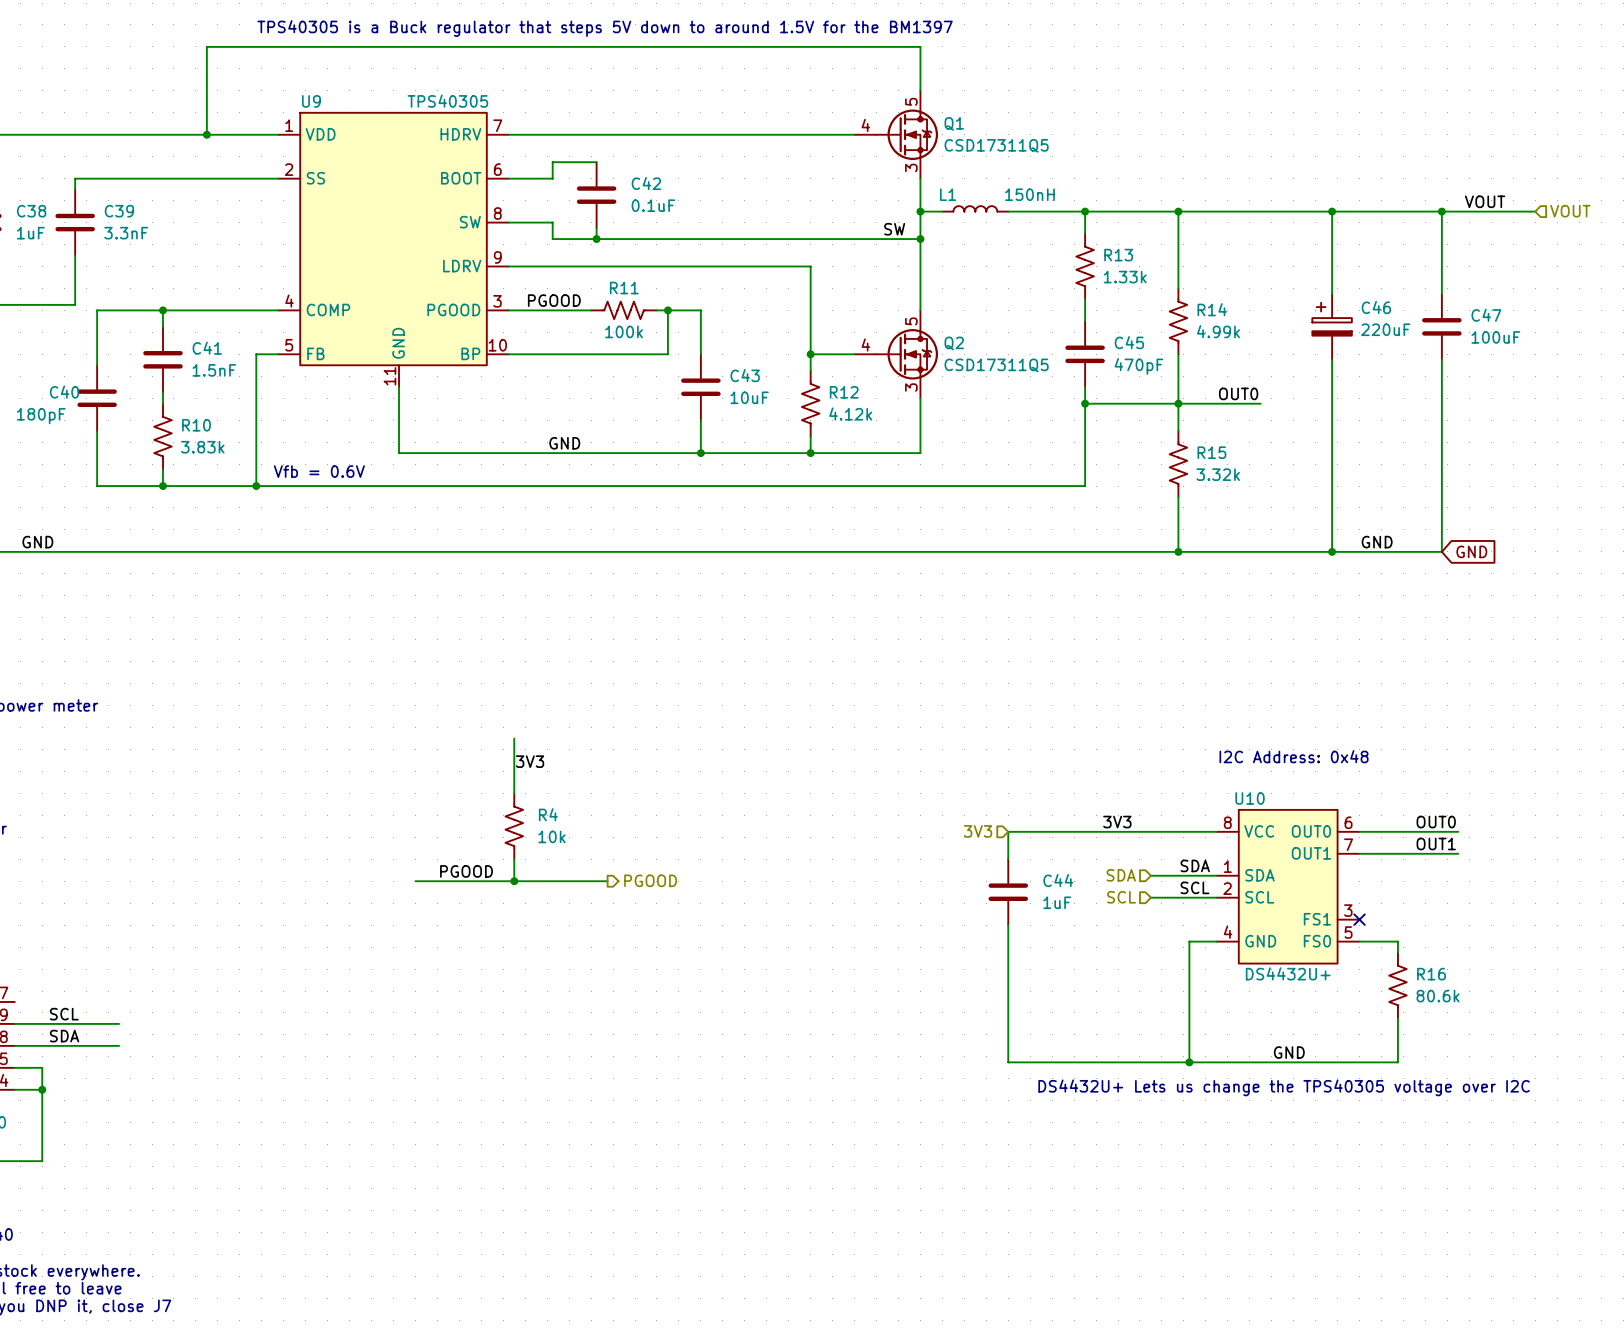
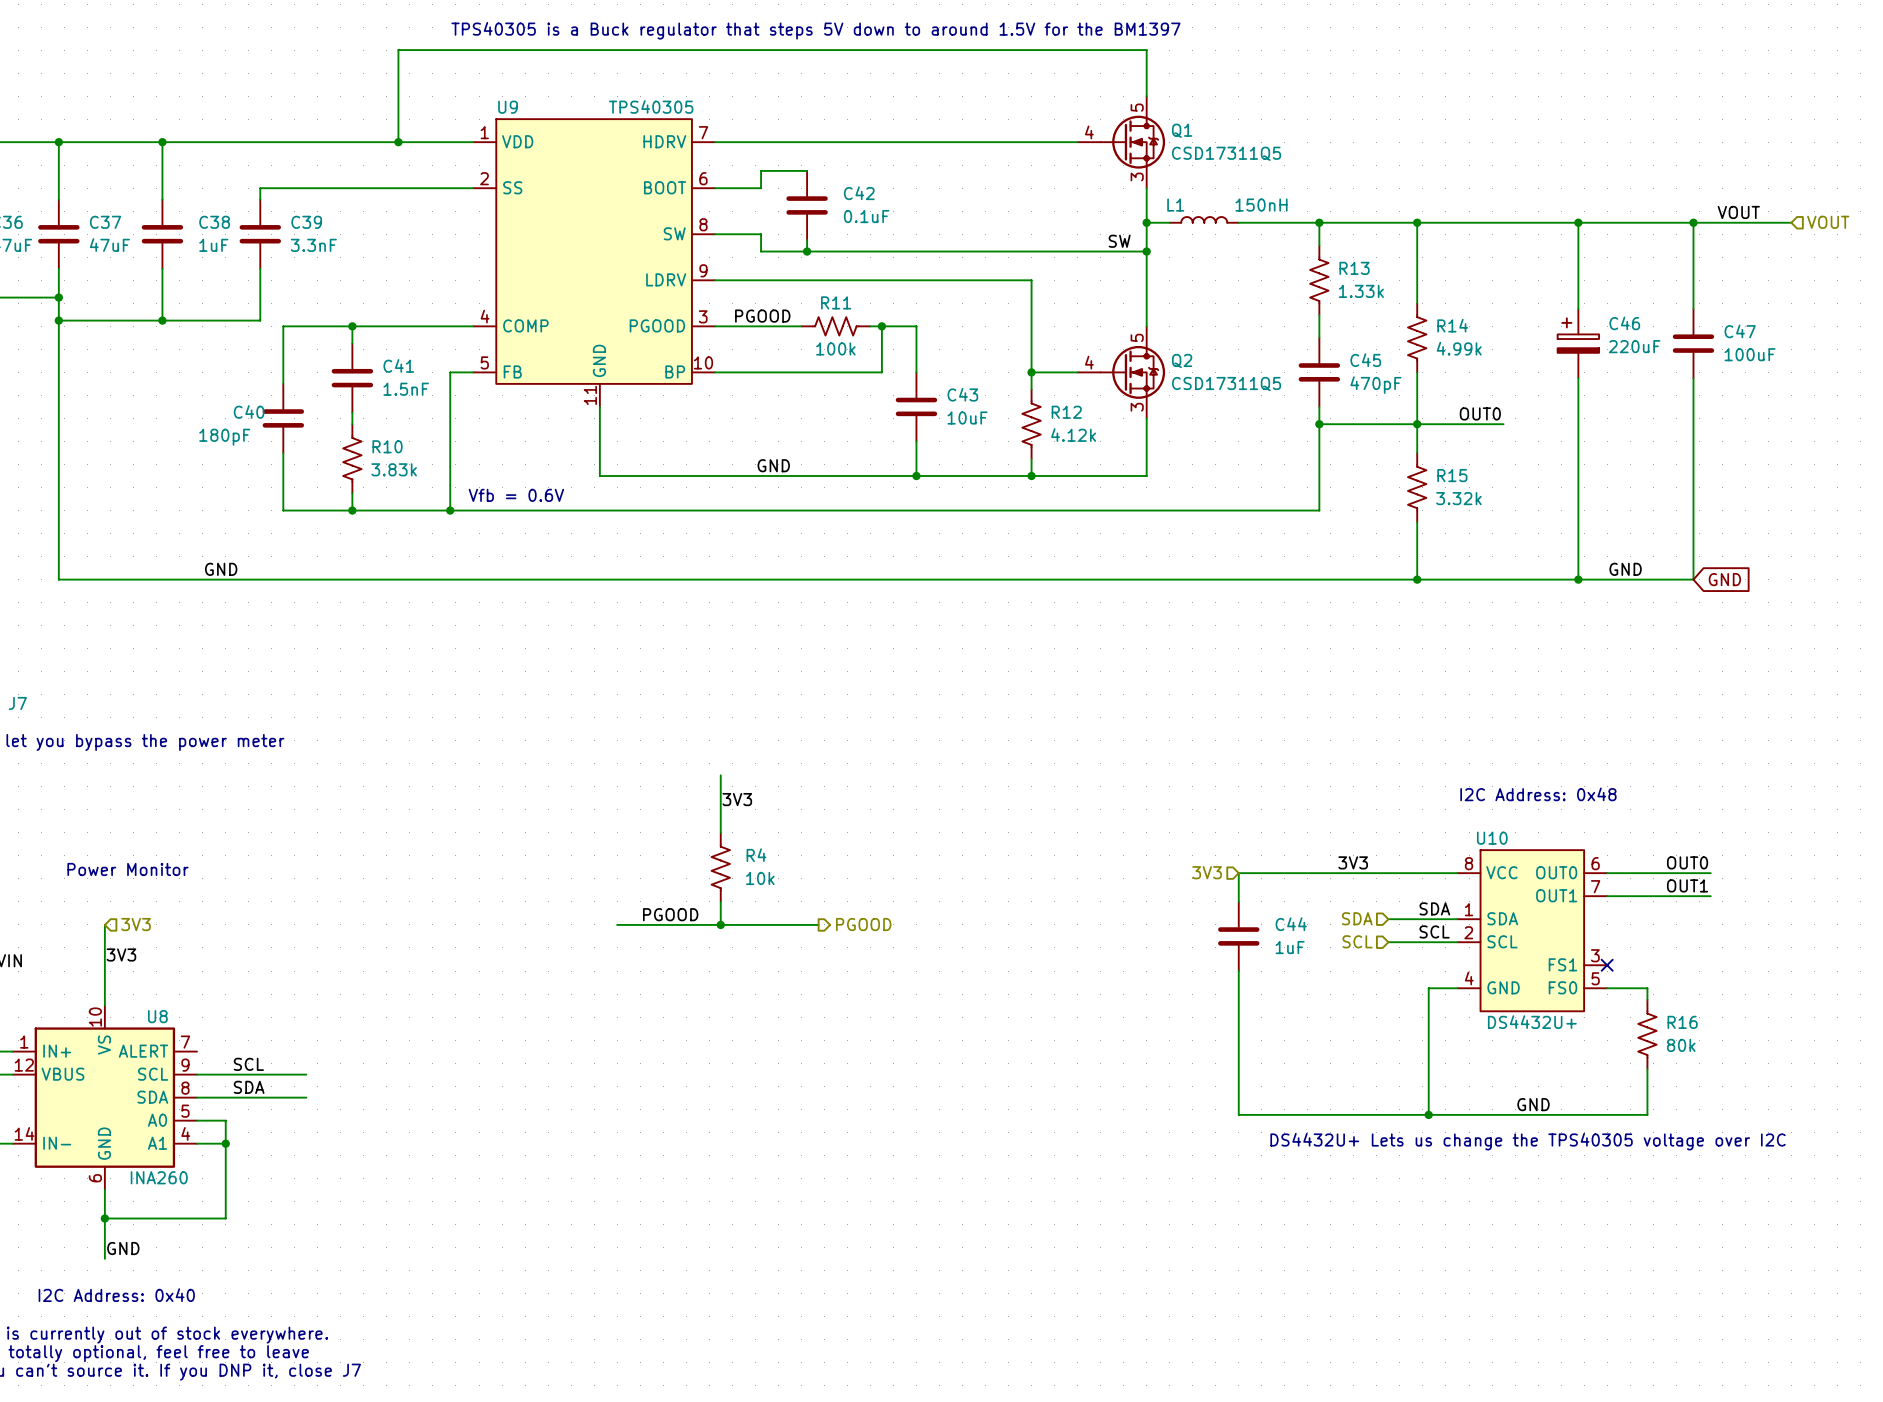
R16 value: 80.6k (1438, 996) -> 80k (1681, 1045)

